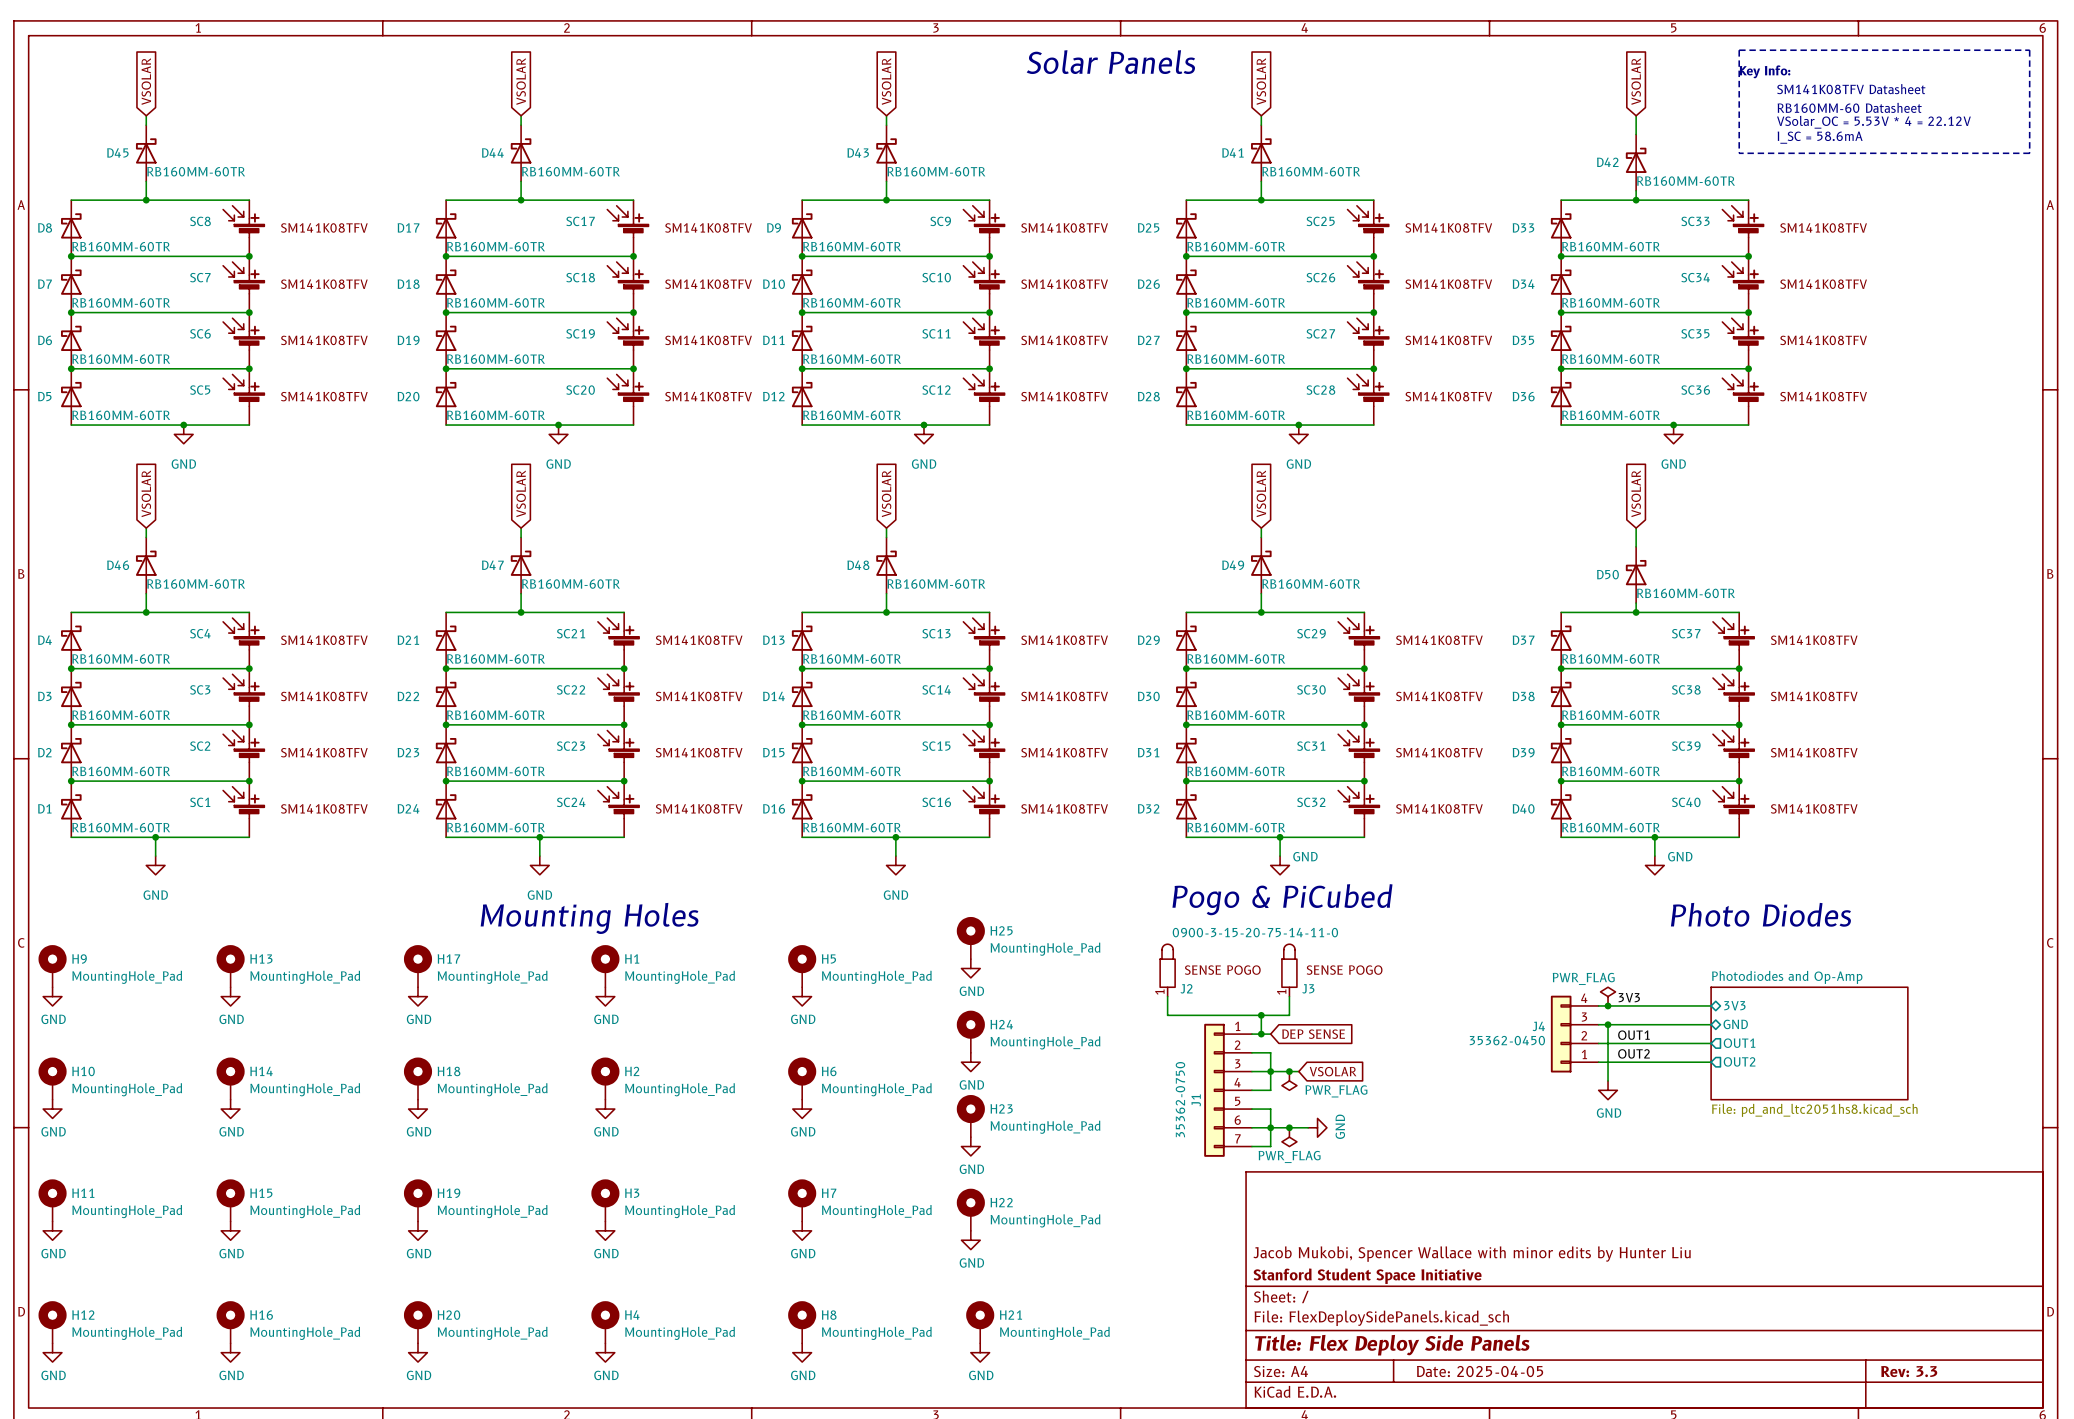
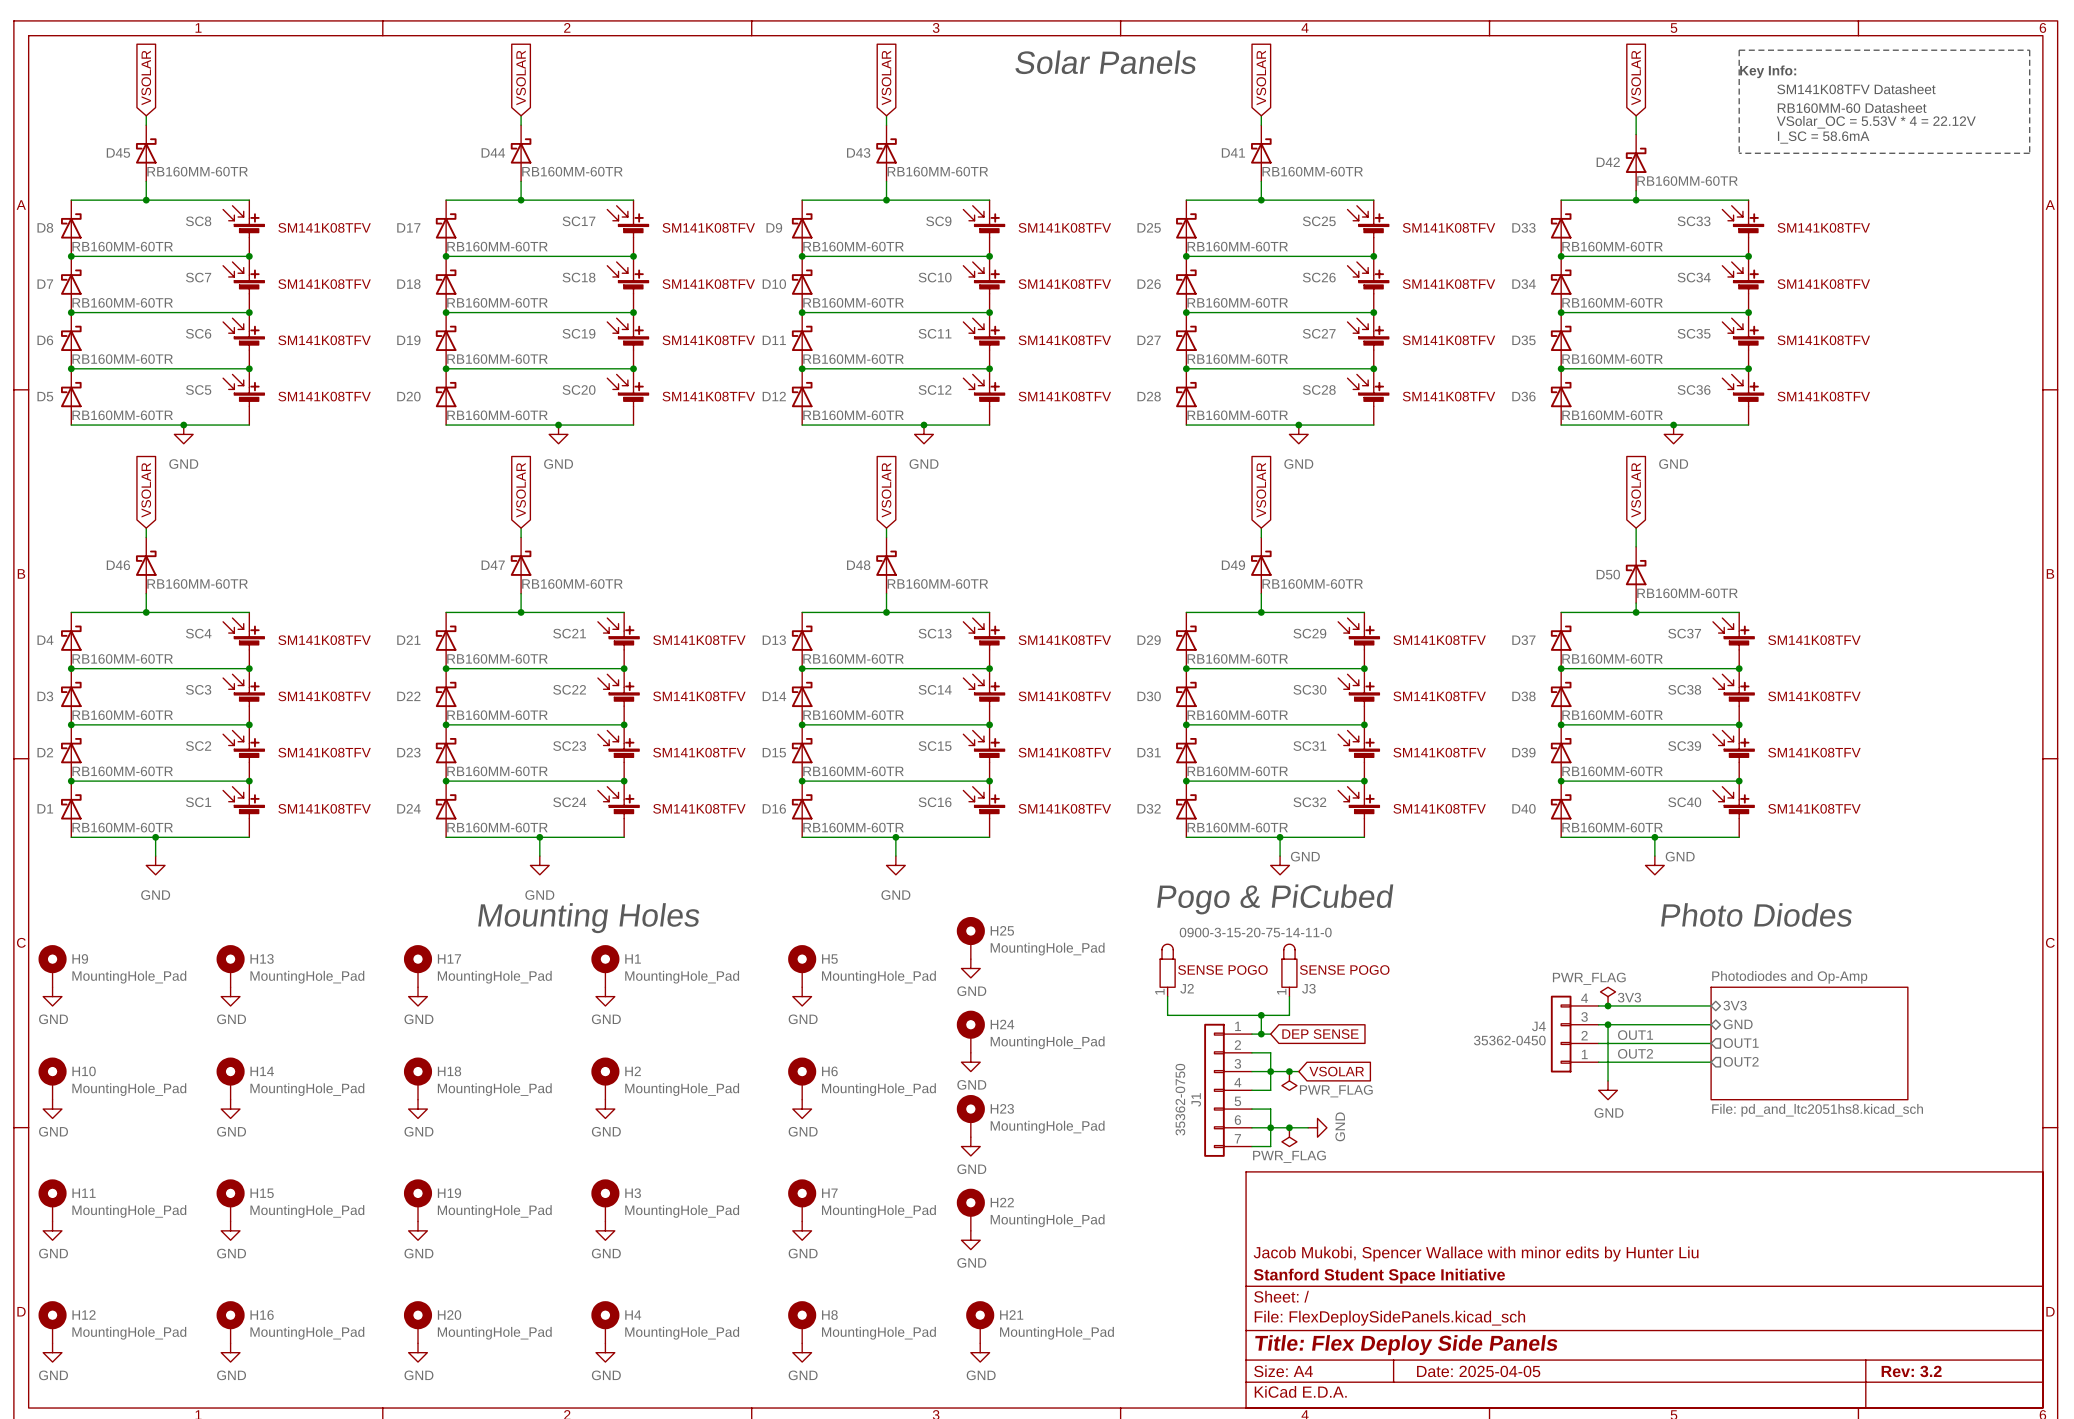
title block: Rev: 3.3 (1909, 1371) -> Rev: 3.2 (1911, 1371)

